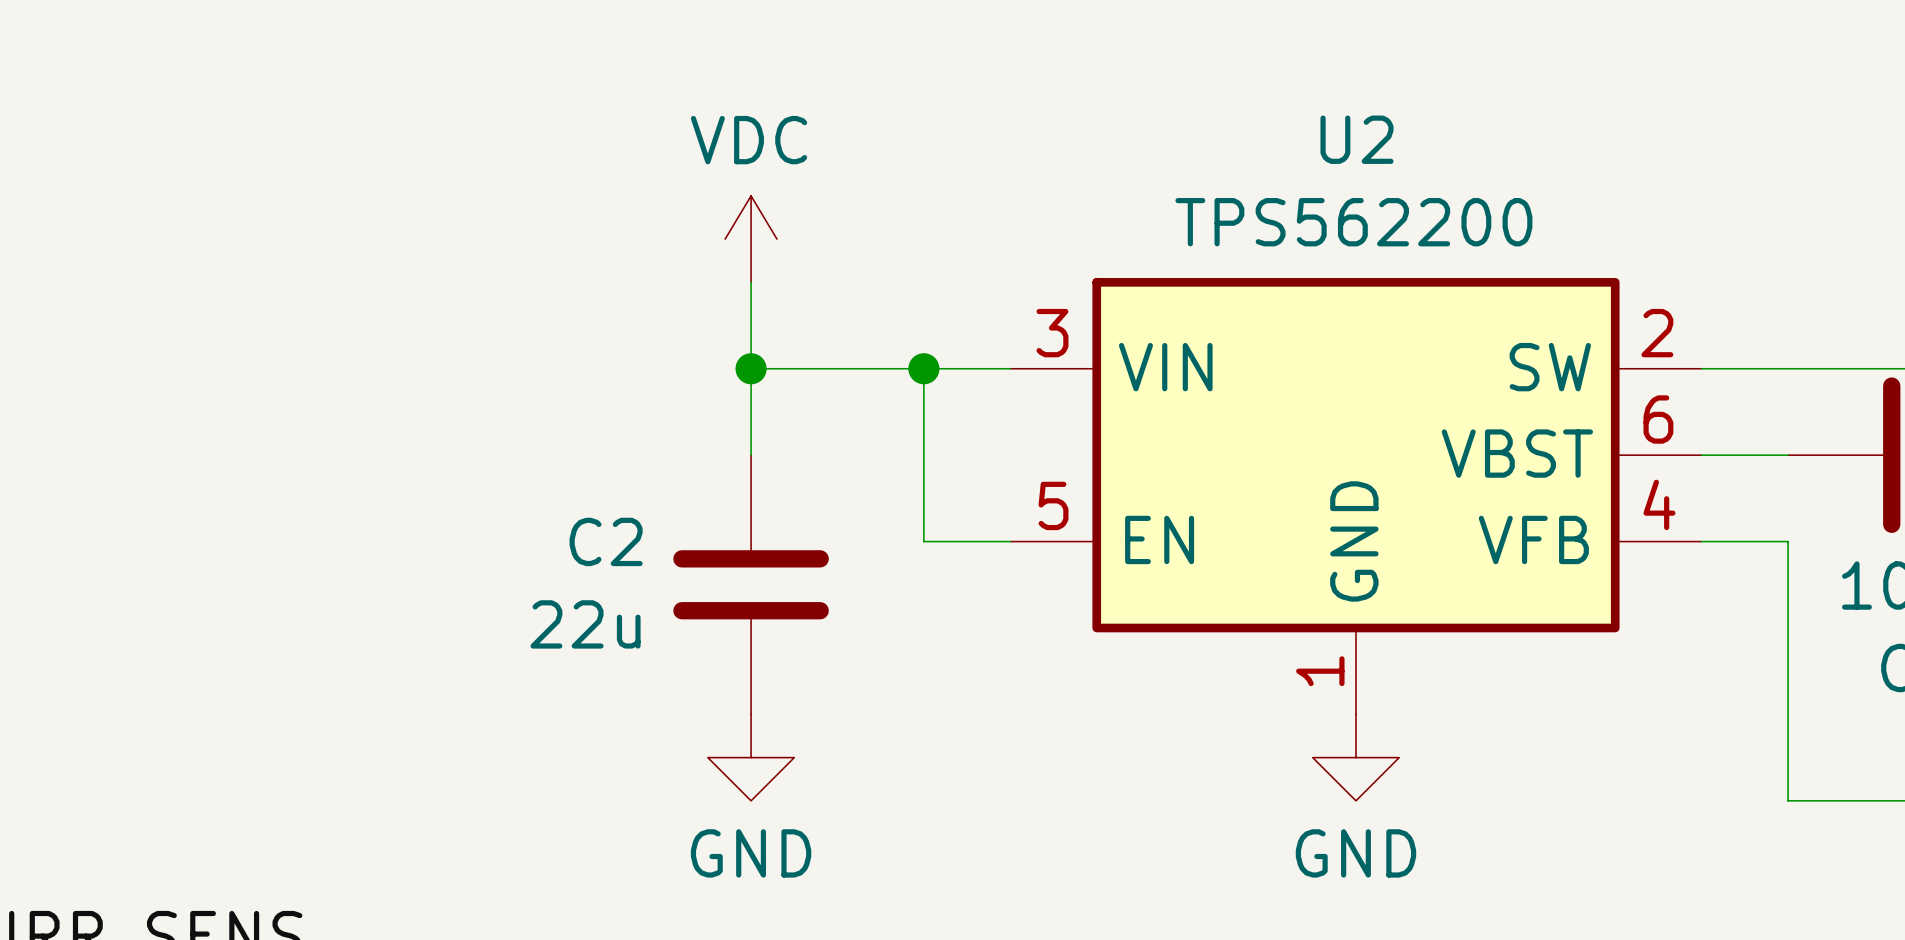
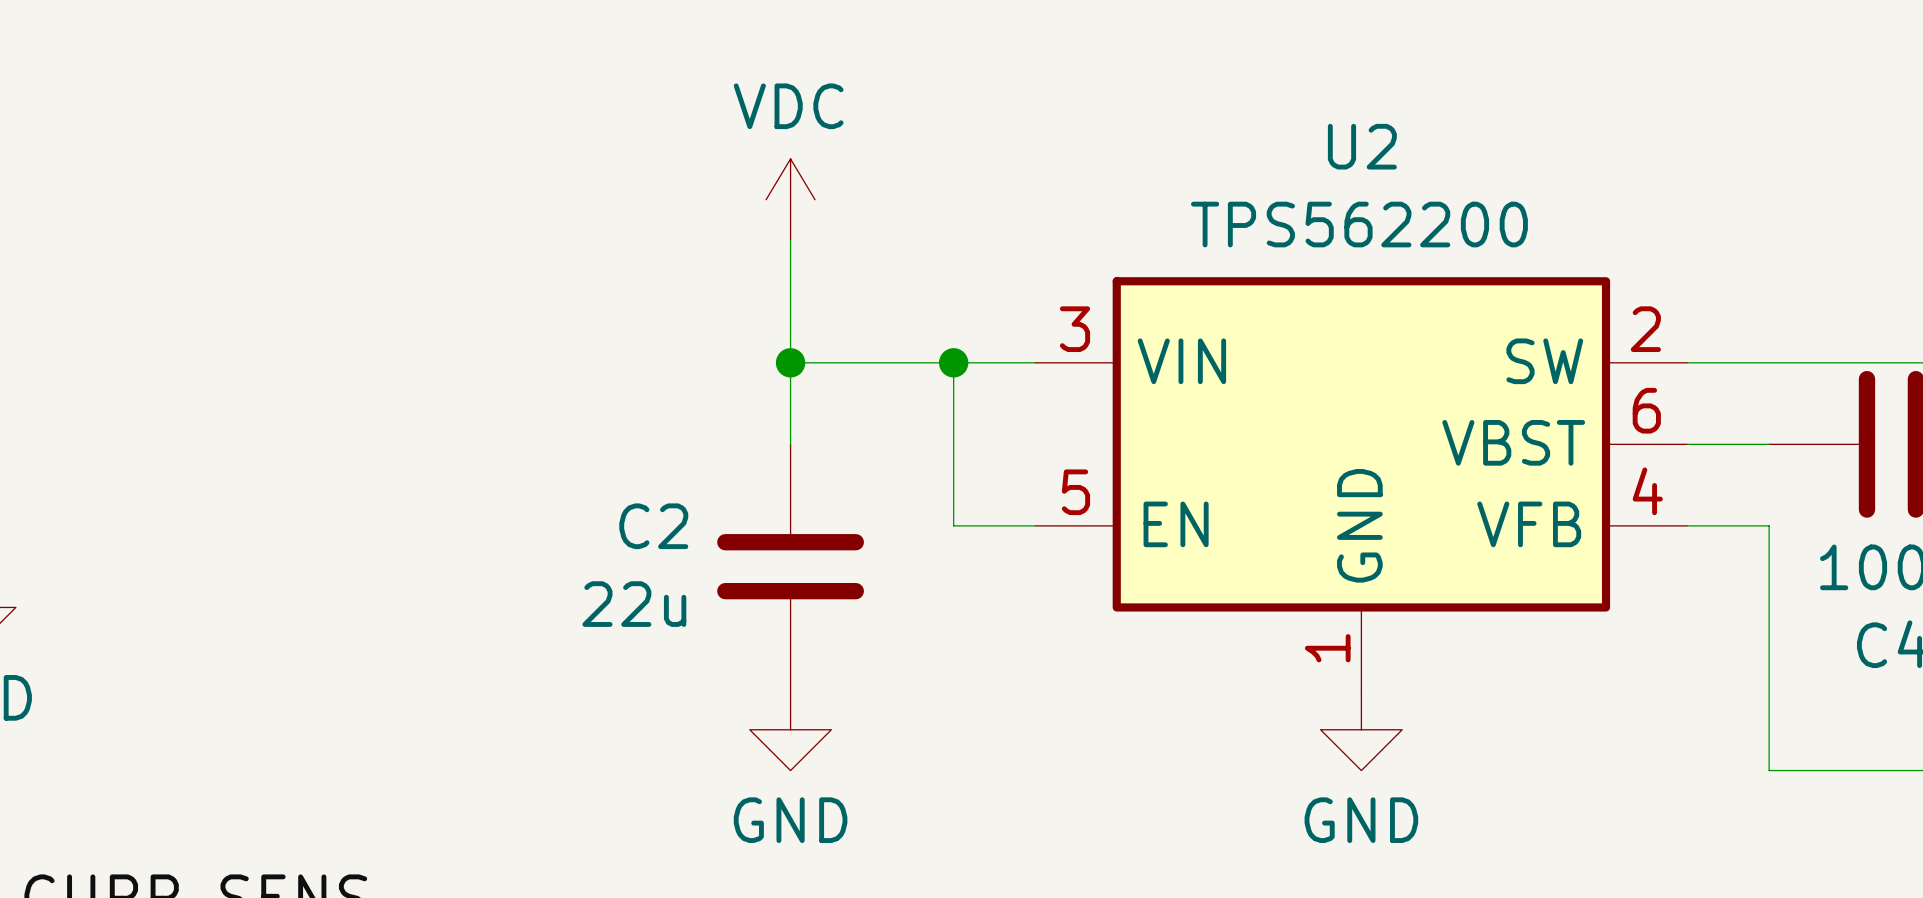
power symbol position: VDC (751, 239) -> VDC (790, 199)

